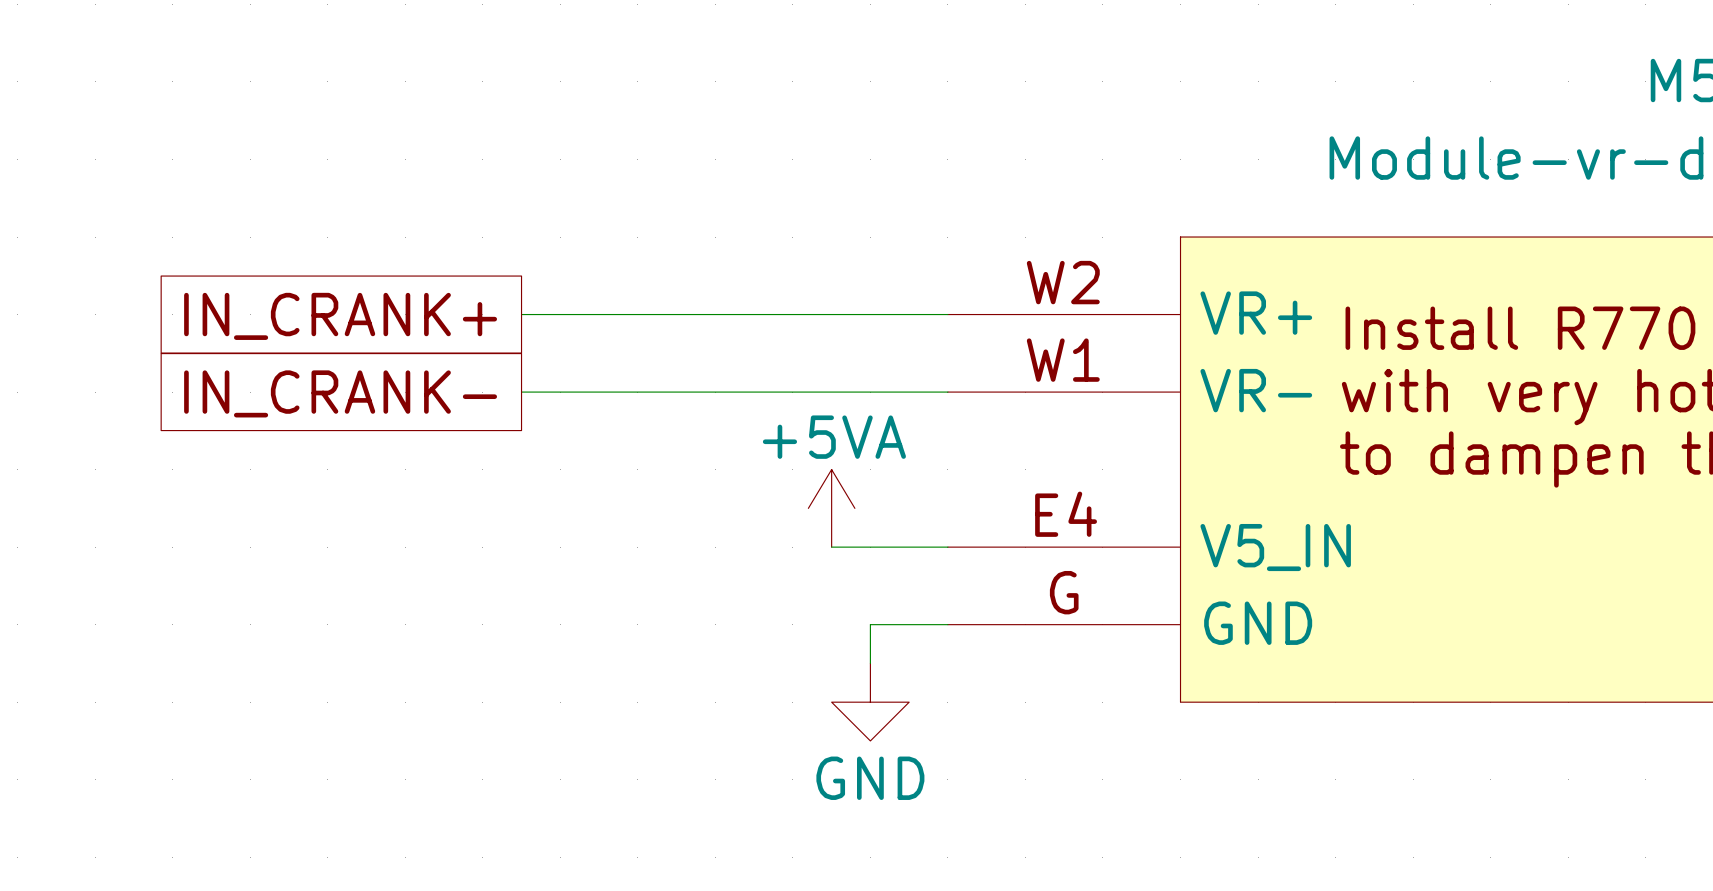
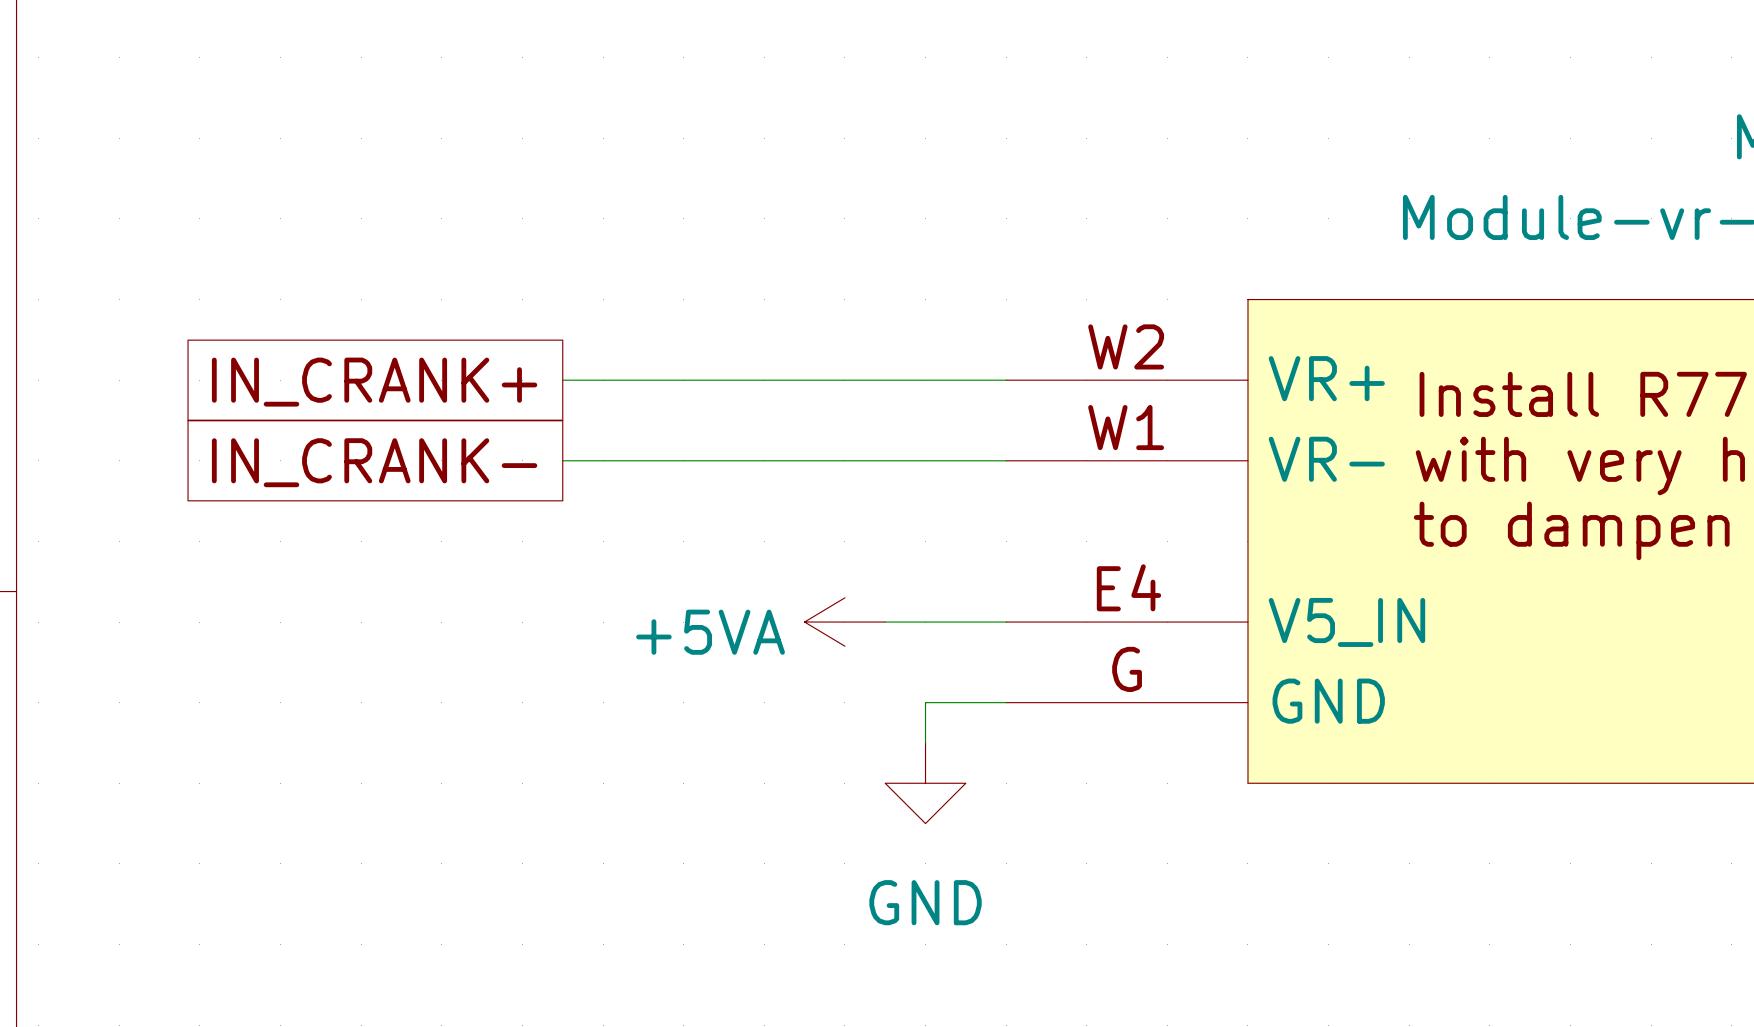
power symbol text position: +5VA (834, 437) -> +5VA (710, 632)
power symbol rotation: 0° (831, 508) -> 90° counterclockwise (844, 622)
power symbol position: +5VA (831, 508) -> +5VA (844, 622)
power symbol text position: GND (870, 778) -> GND (925, 902)

